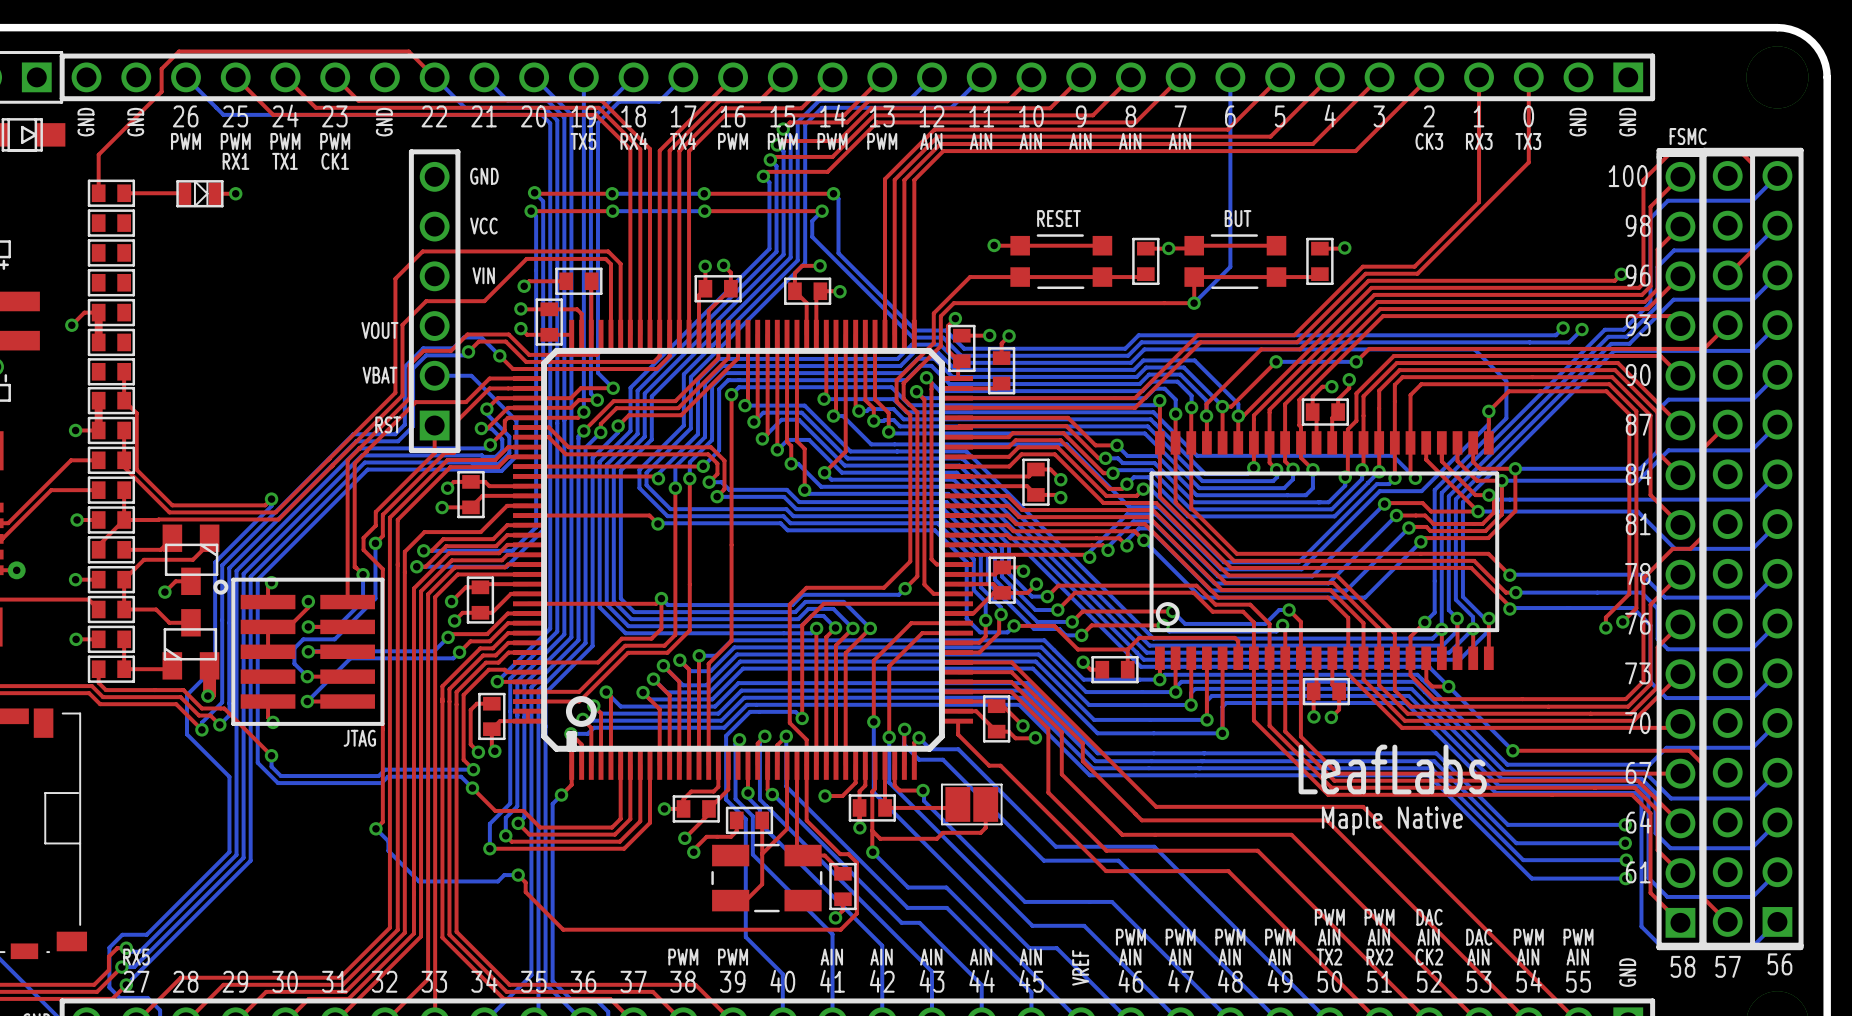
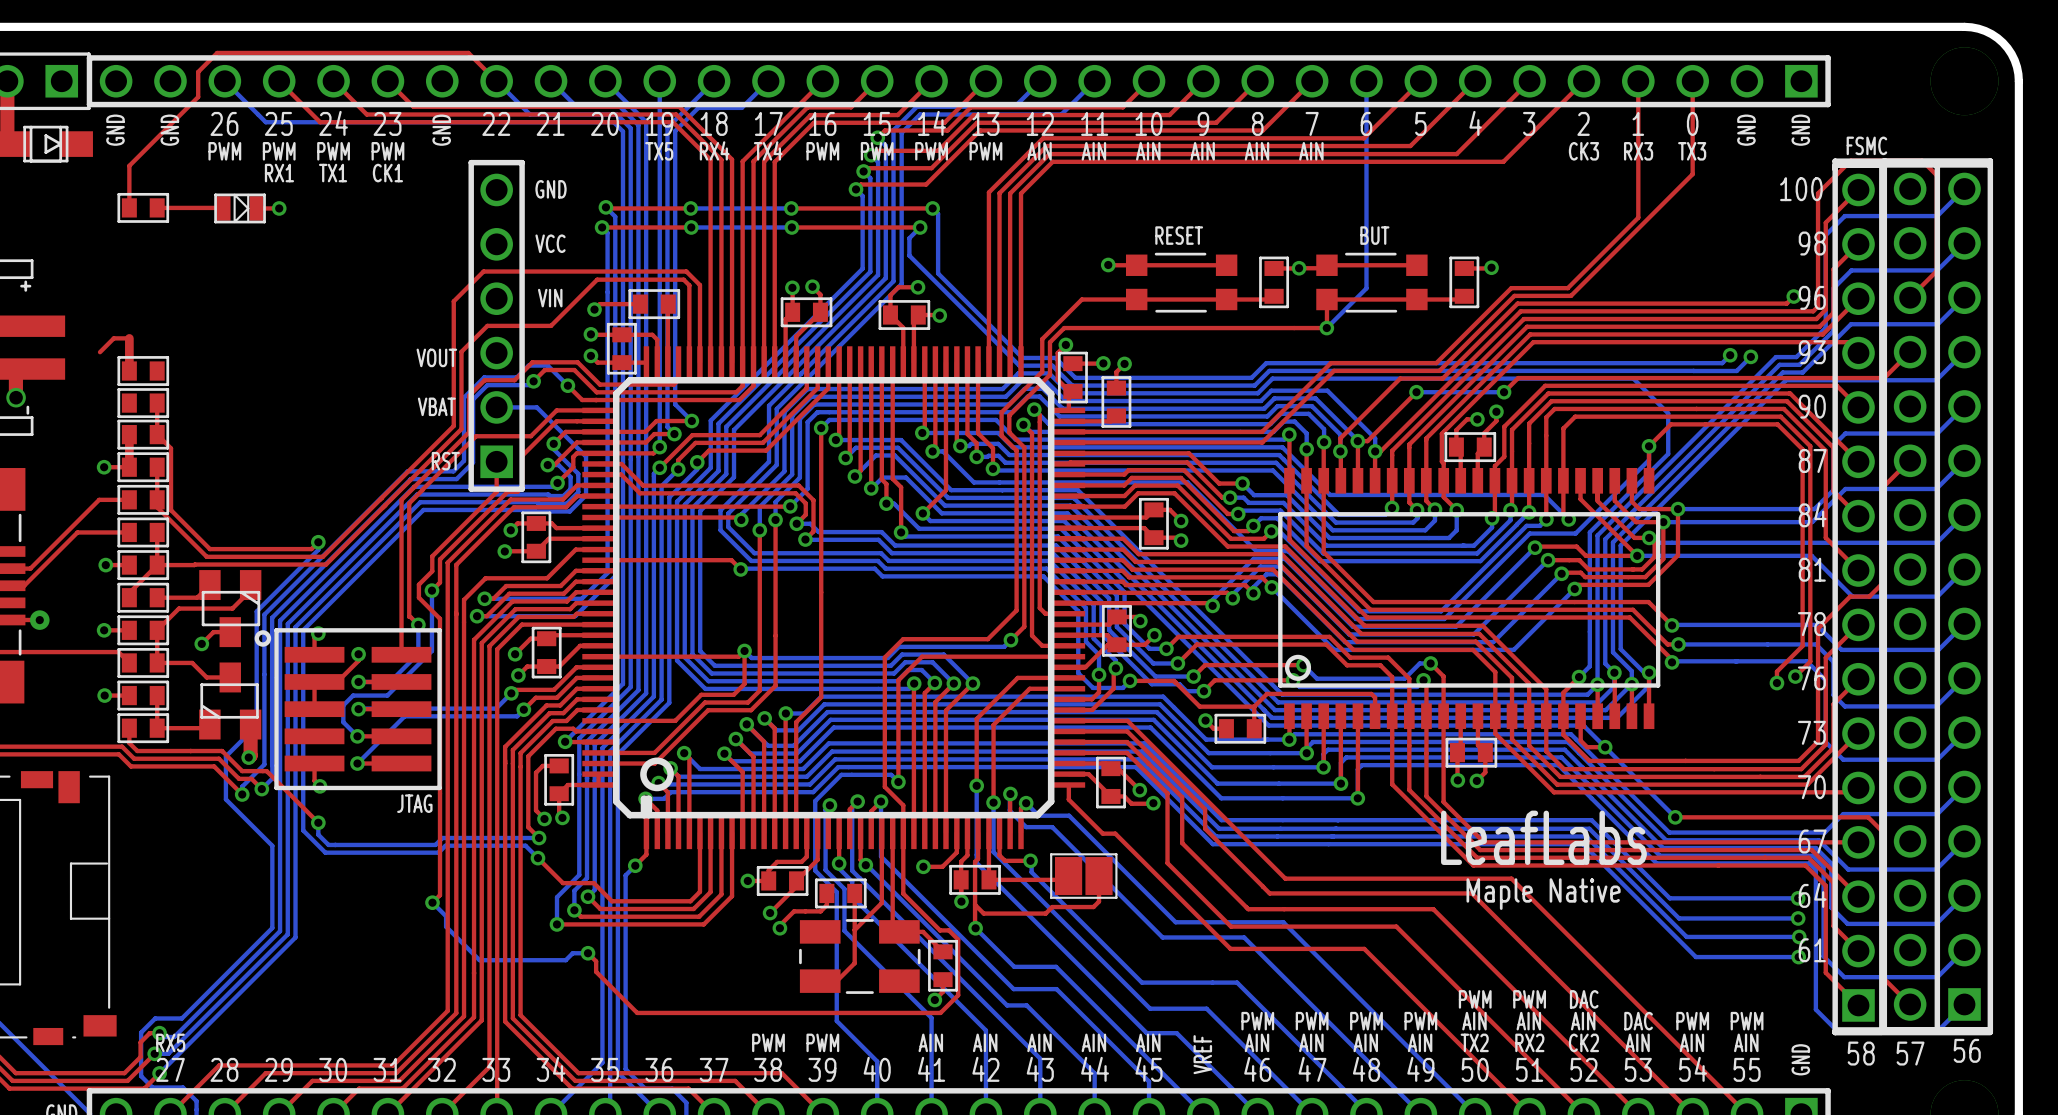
part: (111, 223) -> none
part: (111, 252) -> none
part: (111, 282) -> none
part: (111, 312) -> none
via: (71, 325) -> none

